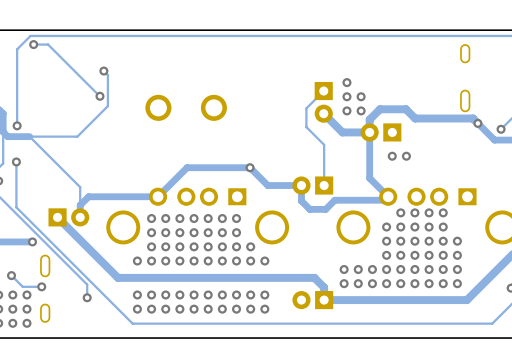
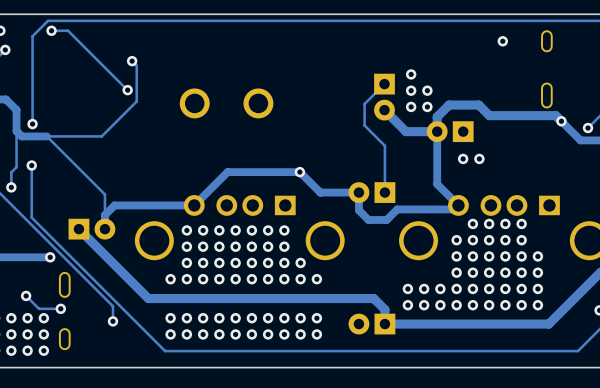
via: none -> (502, 41)

